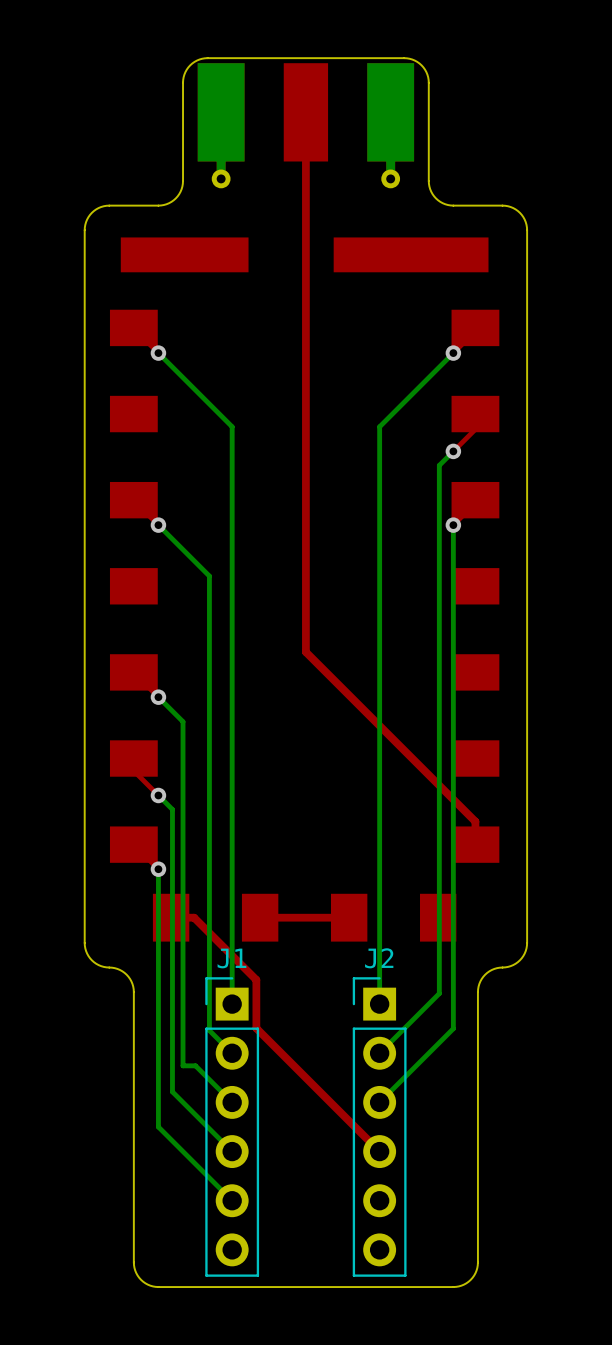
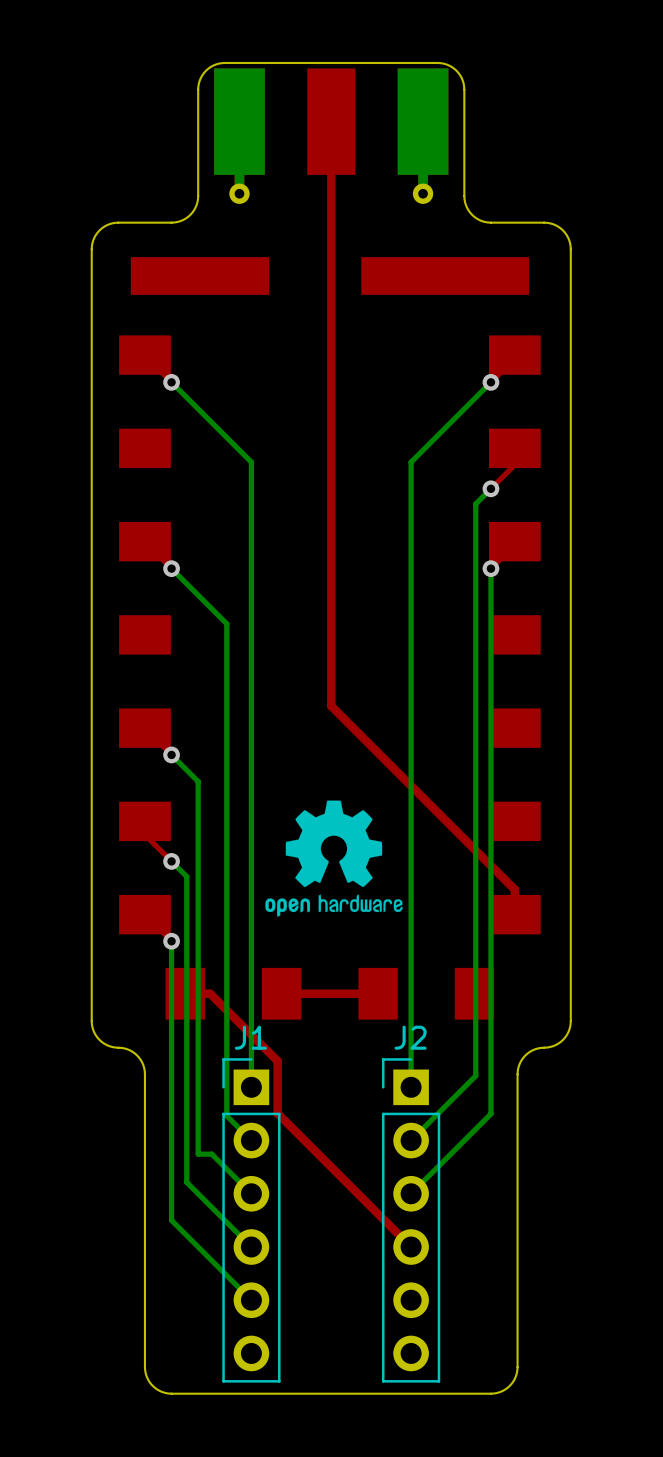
drawing: none -> [265, 800, 403, 917]

